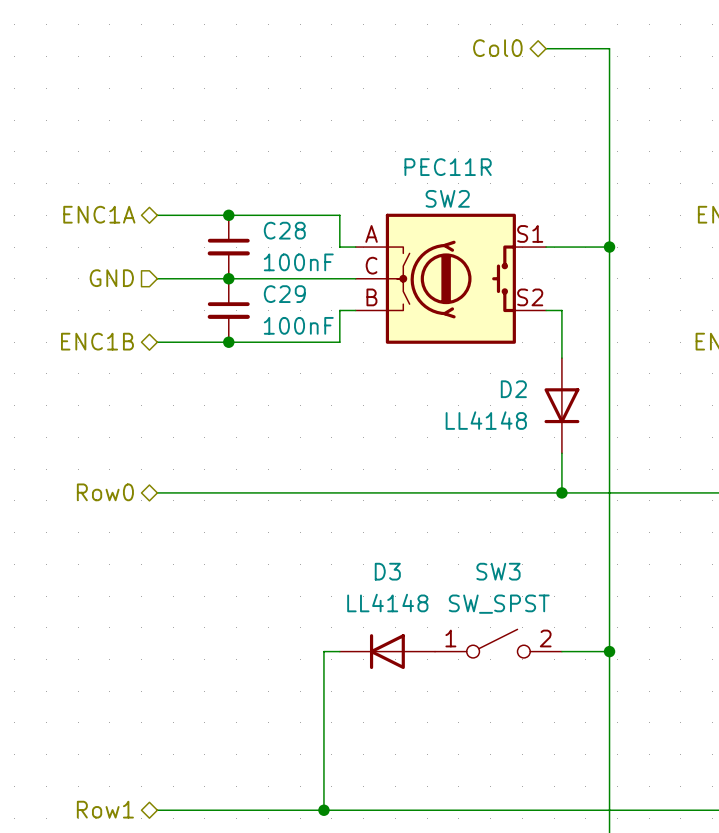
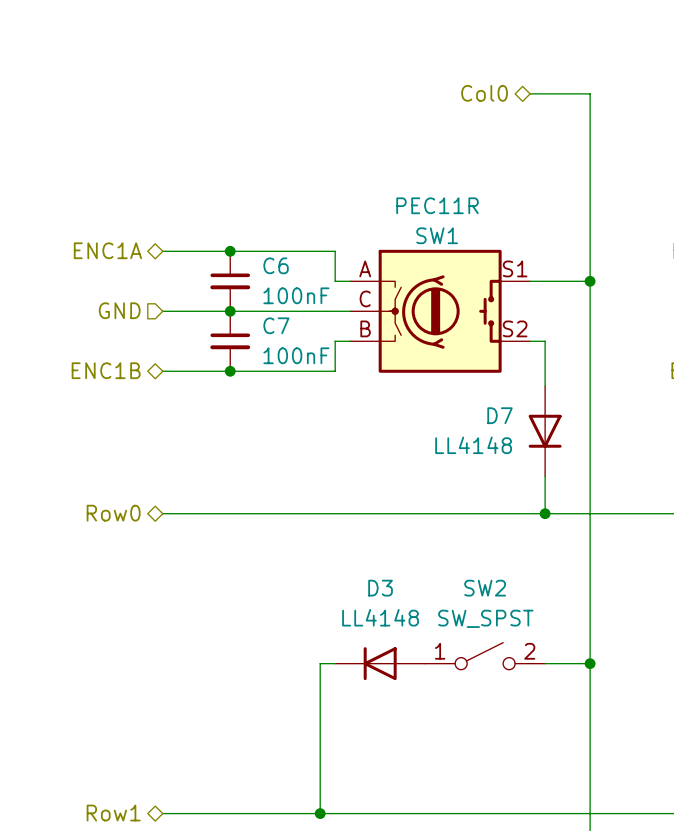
SW2 name: SW2 (447, 198) -> SW1 (437, 235)
C28 name: C28 (284, 230) -> C6 (276, 265)
C29 name: C29 (284, 294) -> C7 (276, 325)
D2 name: D2 (513, 389) -> D7 (500, 415)
SW3 name: SW3 (498, 571) -> SW2 (485, 588)

